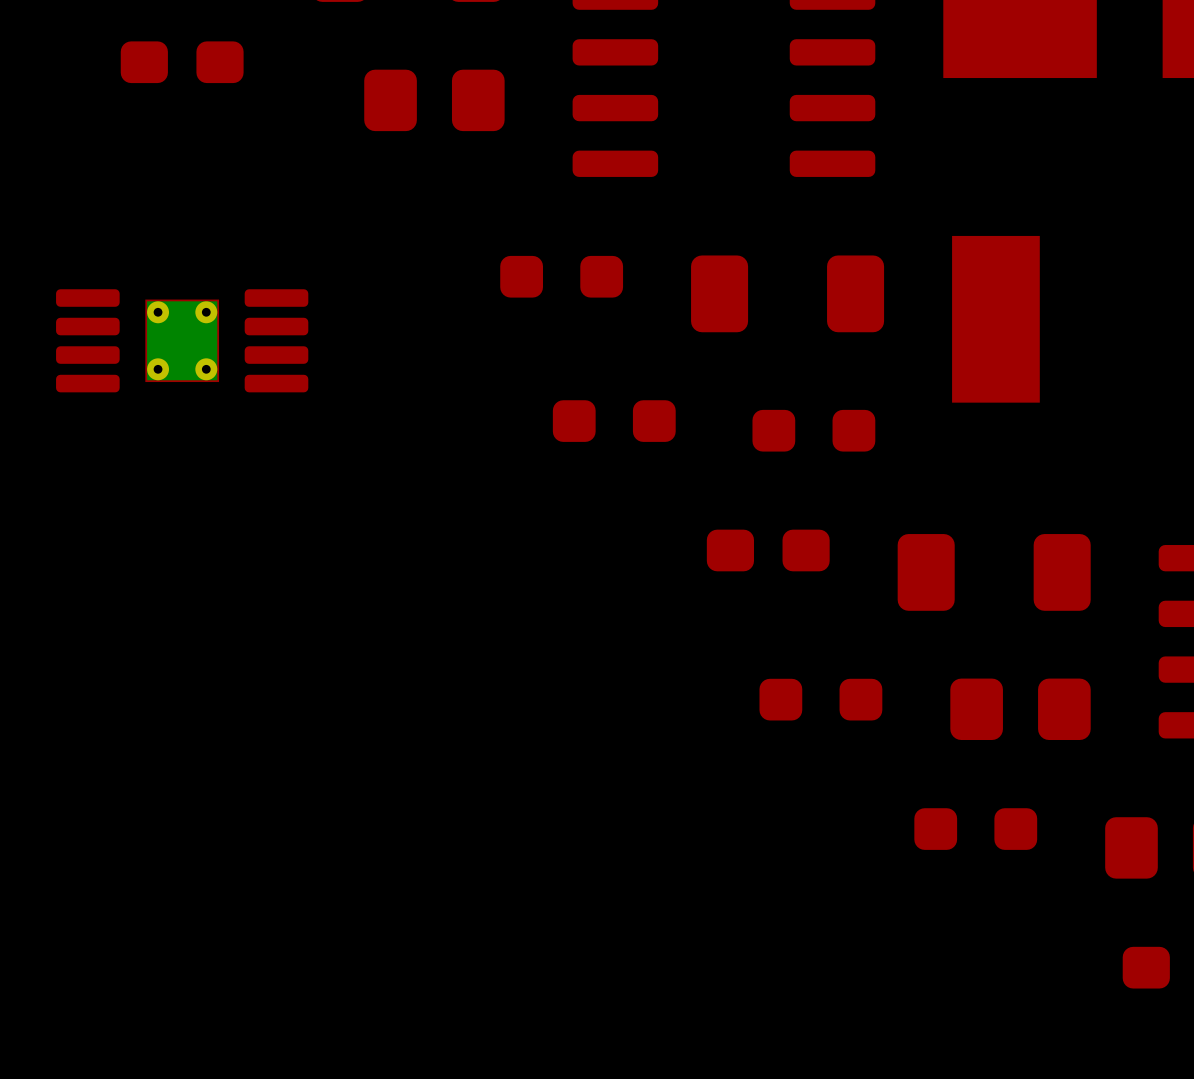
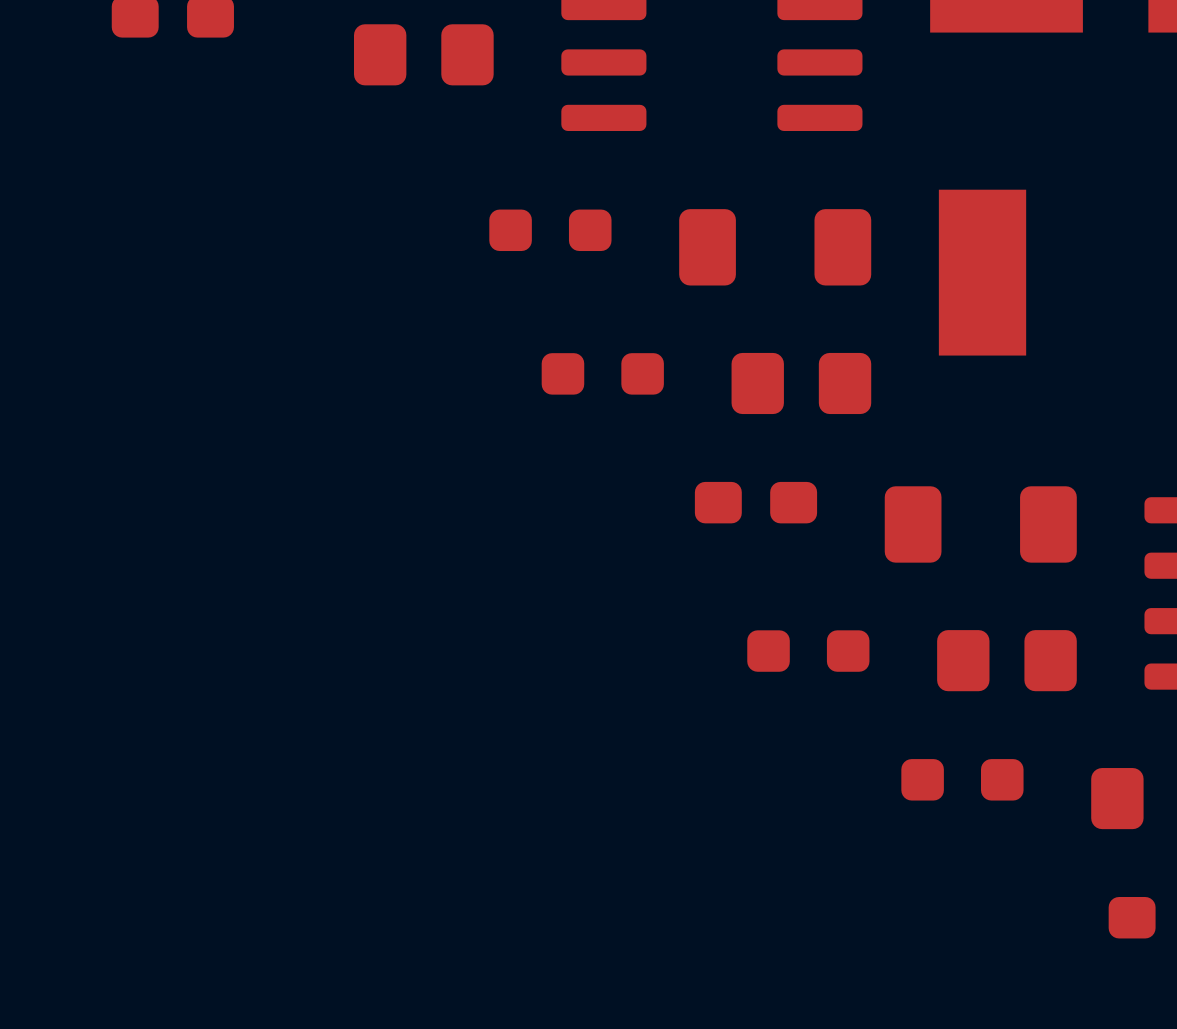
part: (182, 340) -> none
part footprint: [752, 409, 876, 452] -> [731, 352, 872, 415]

